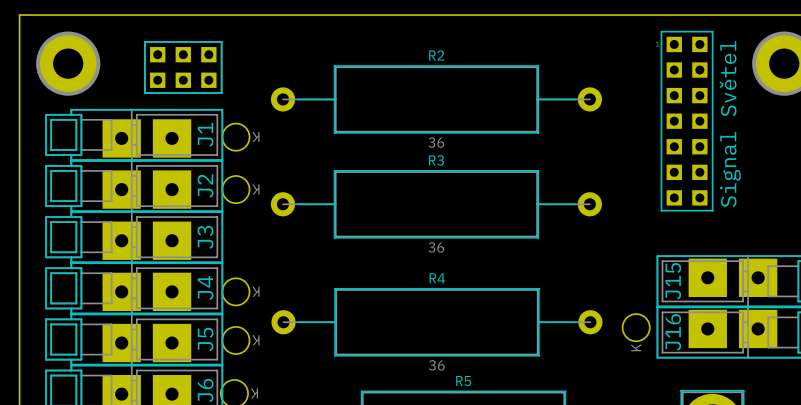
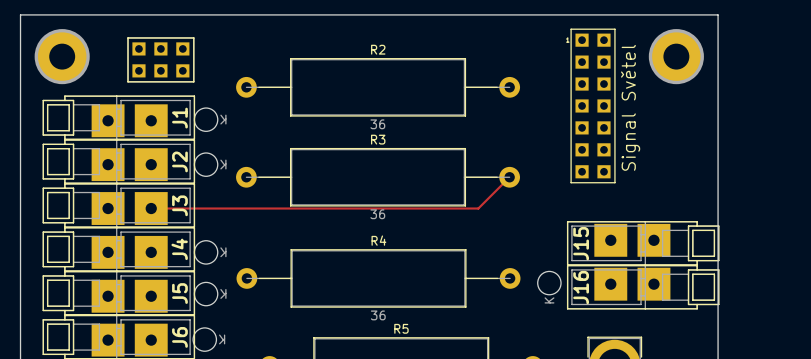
track: none -> (509, 177) (478, 208) (151, 208)

